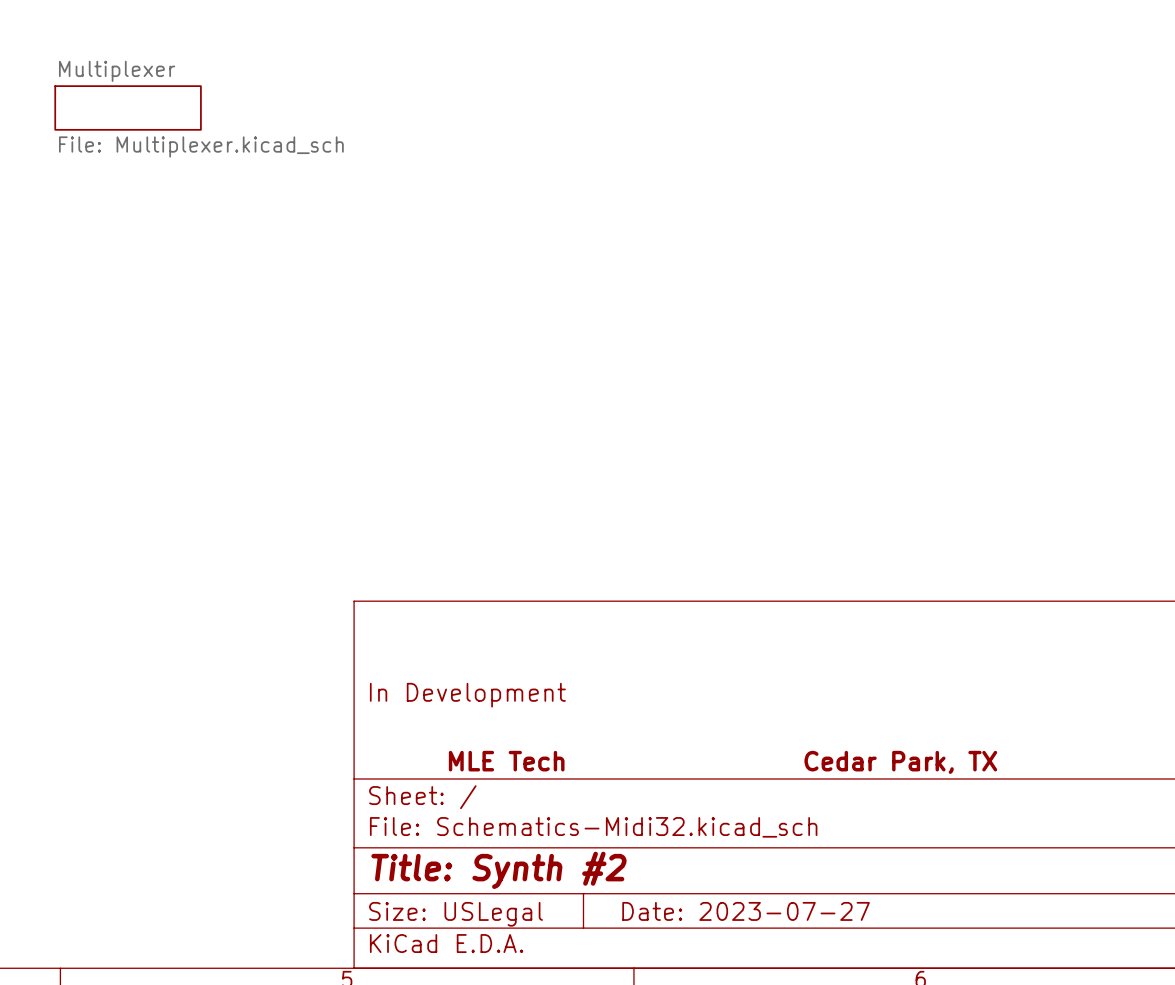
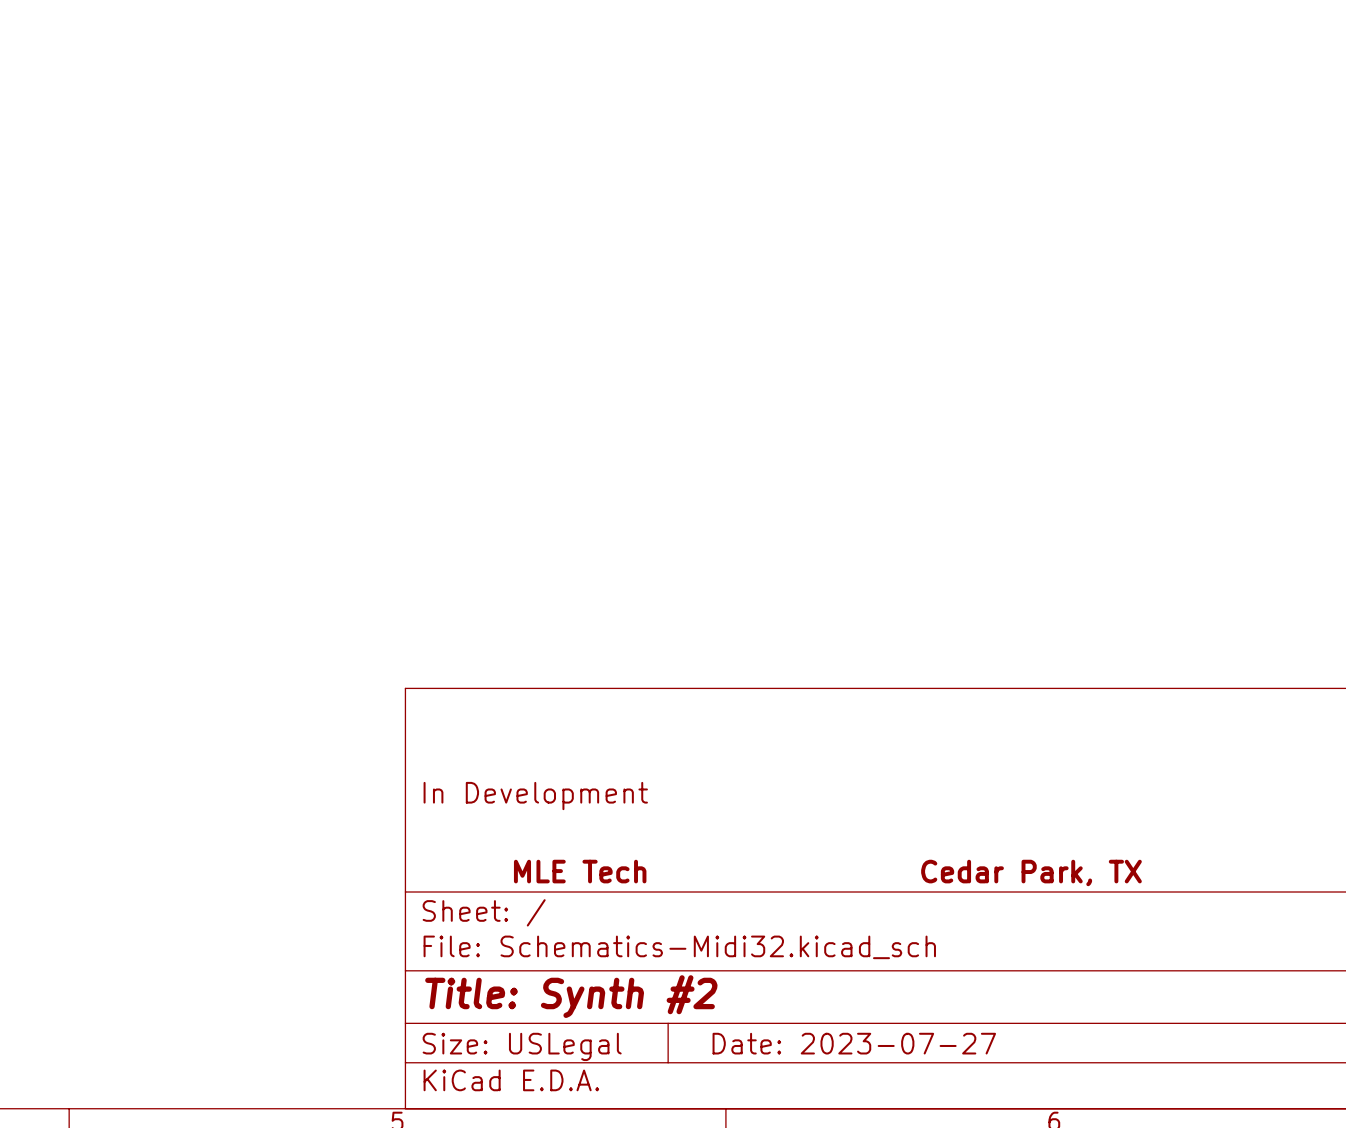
sheet Multiplexer: File: Multiplexer.kicad_sch (128, 107) -> none

